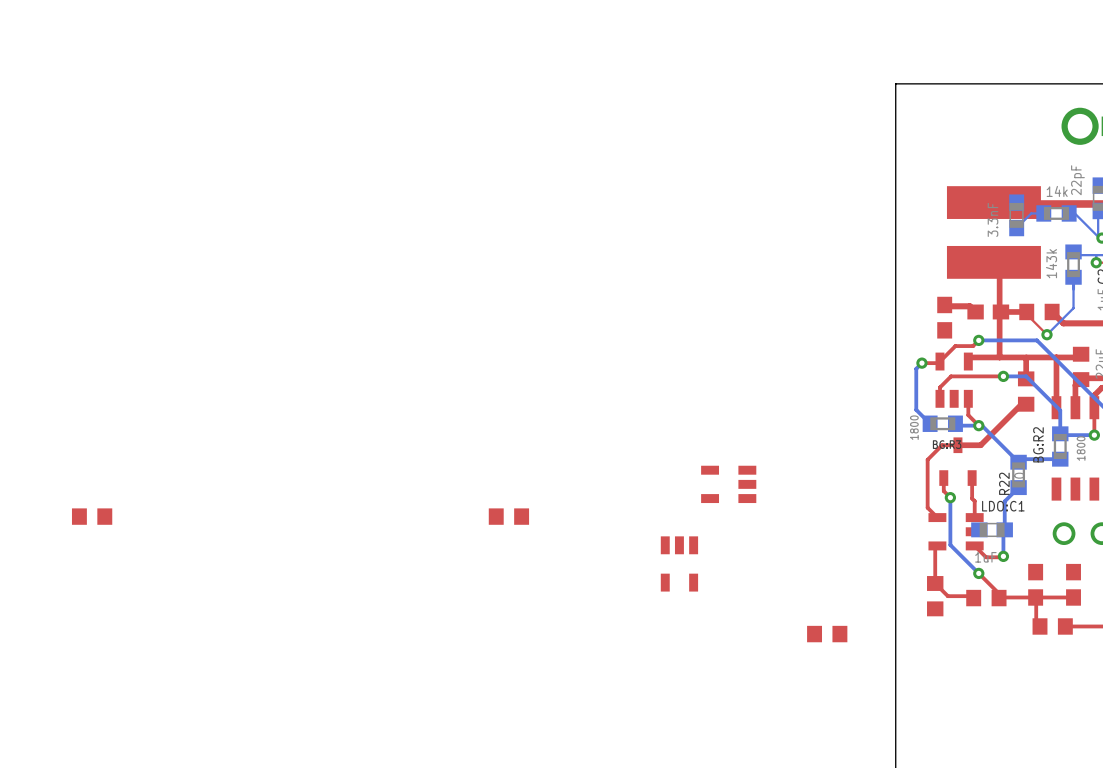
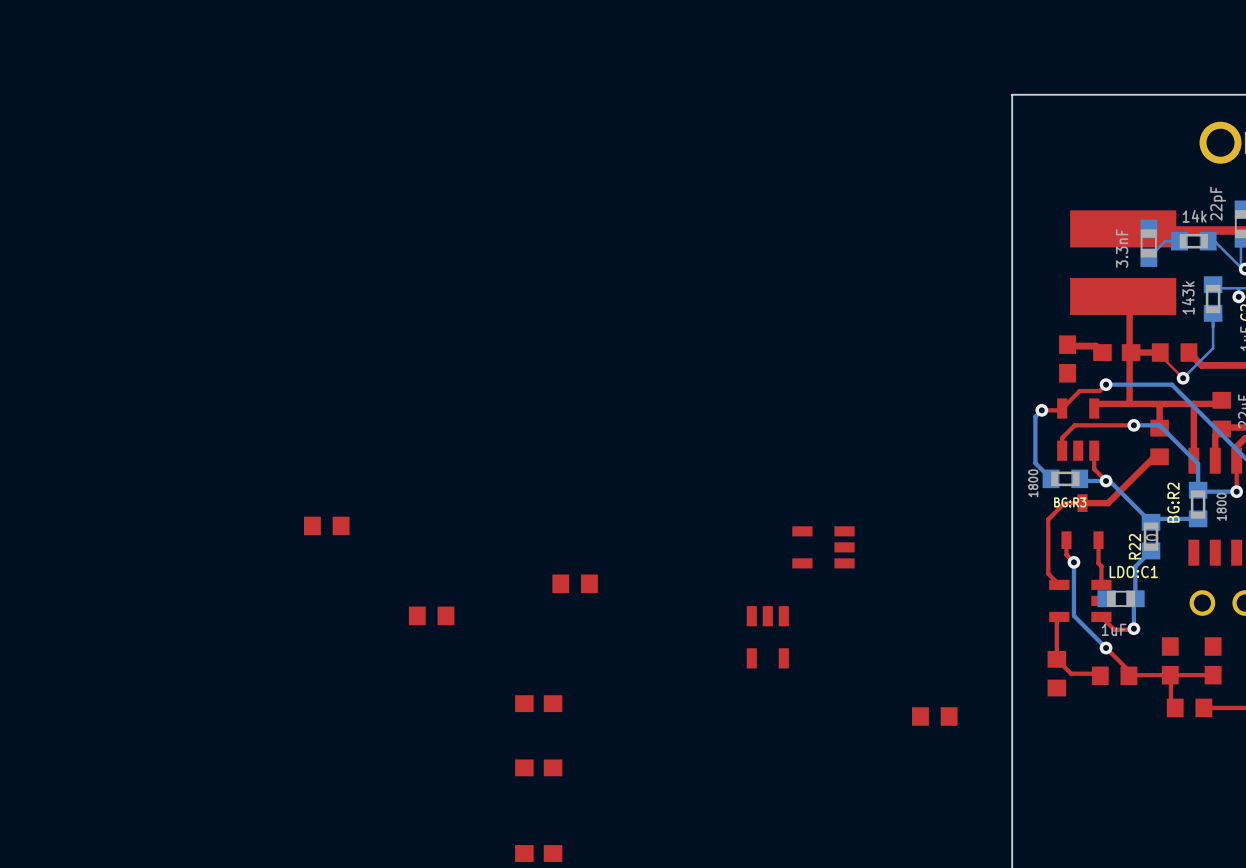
part: none -> (326, 525)
part: (92, 516) -> none
part: none -> (431, 615)
part: none -> (538, 703)
part: none -> (538, 767)
part: none -> (538, 853)

